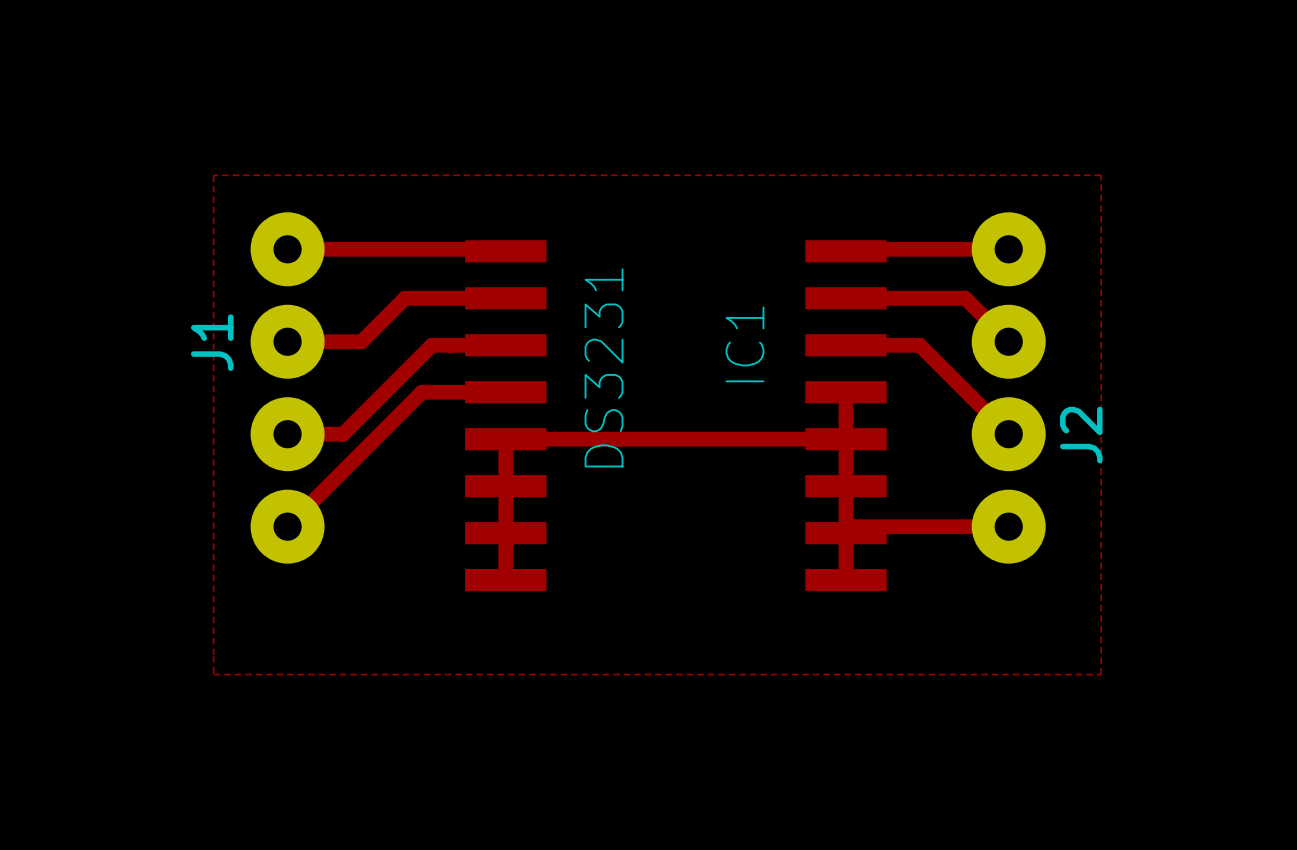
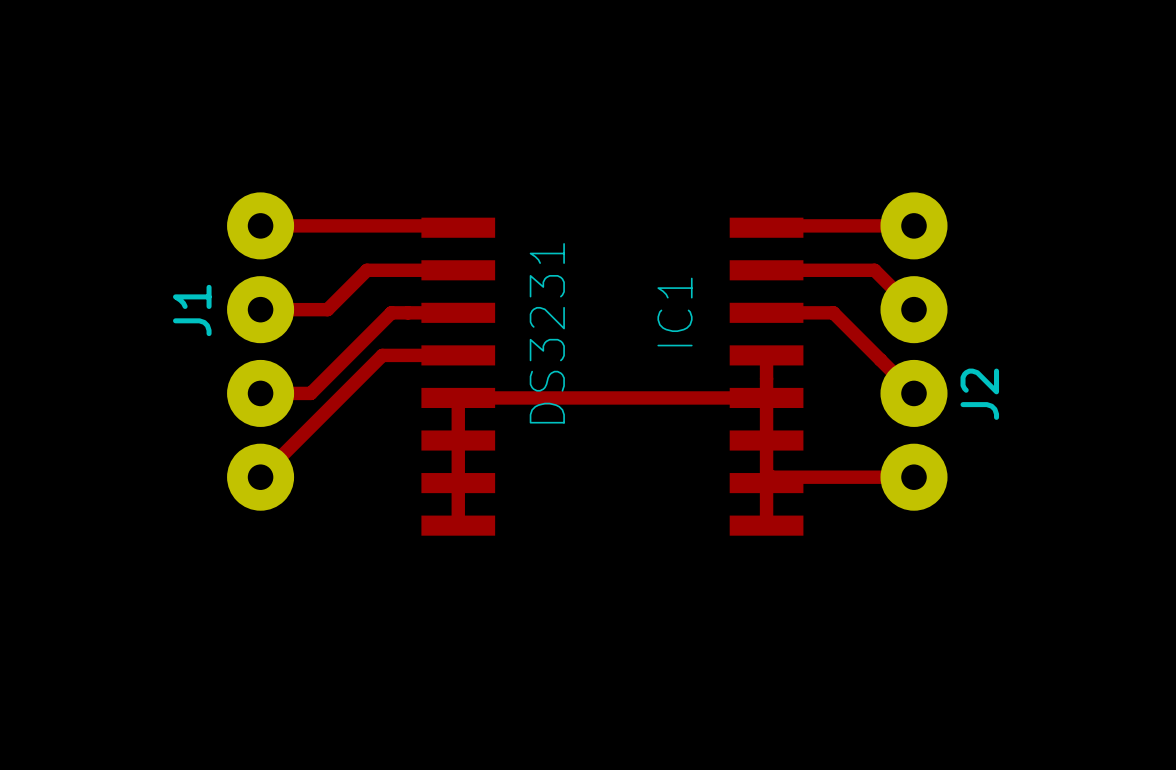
top zone outline: (213, 175) (213, 674) (1101, 674) (1101, 175) (213, 175) -> none

